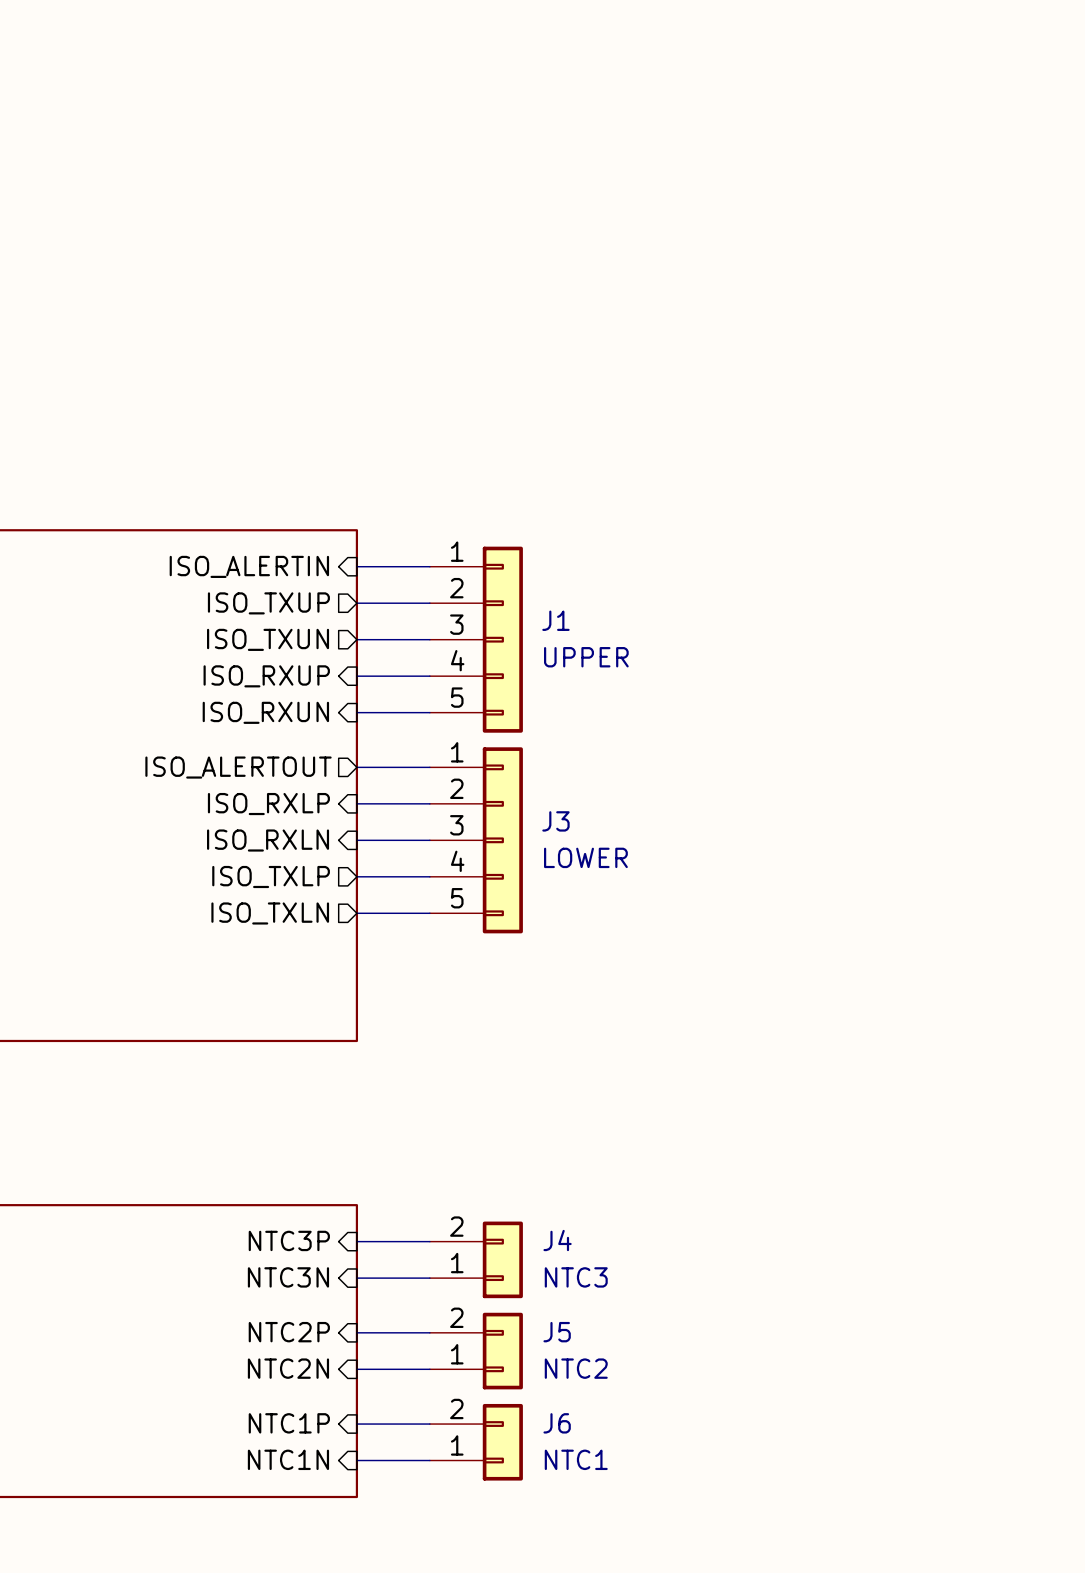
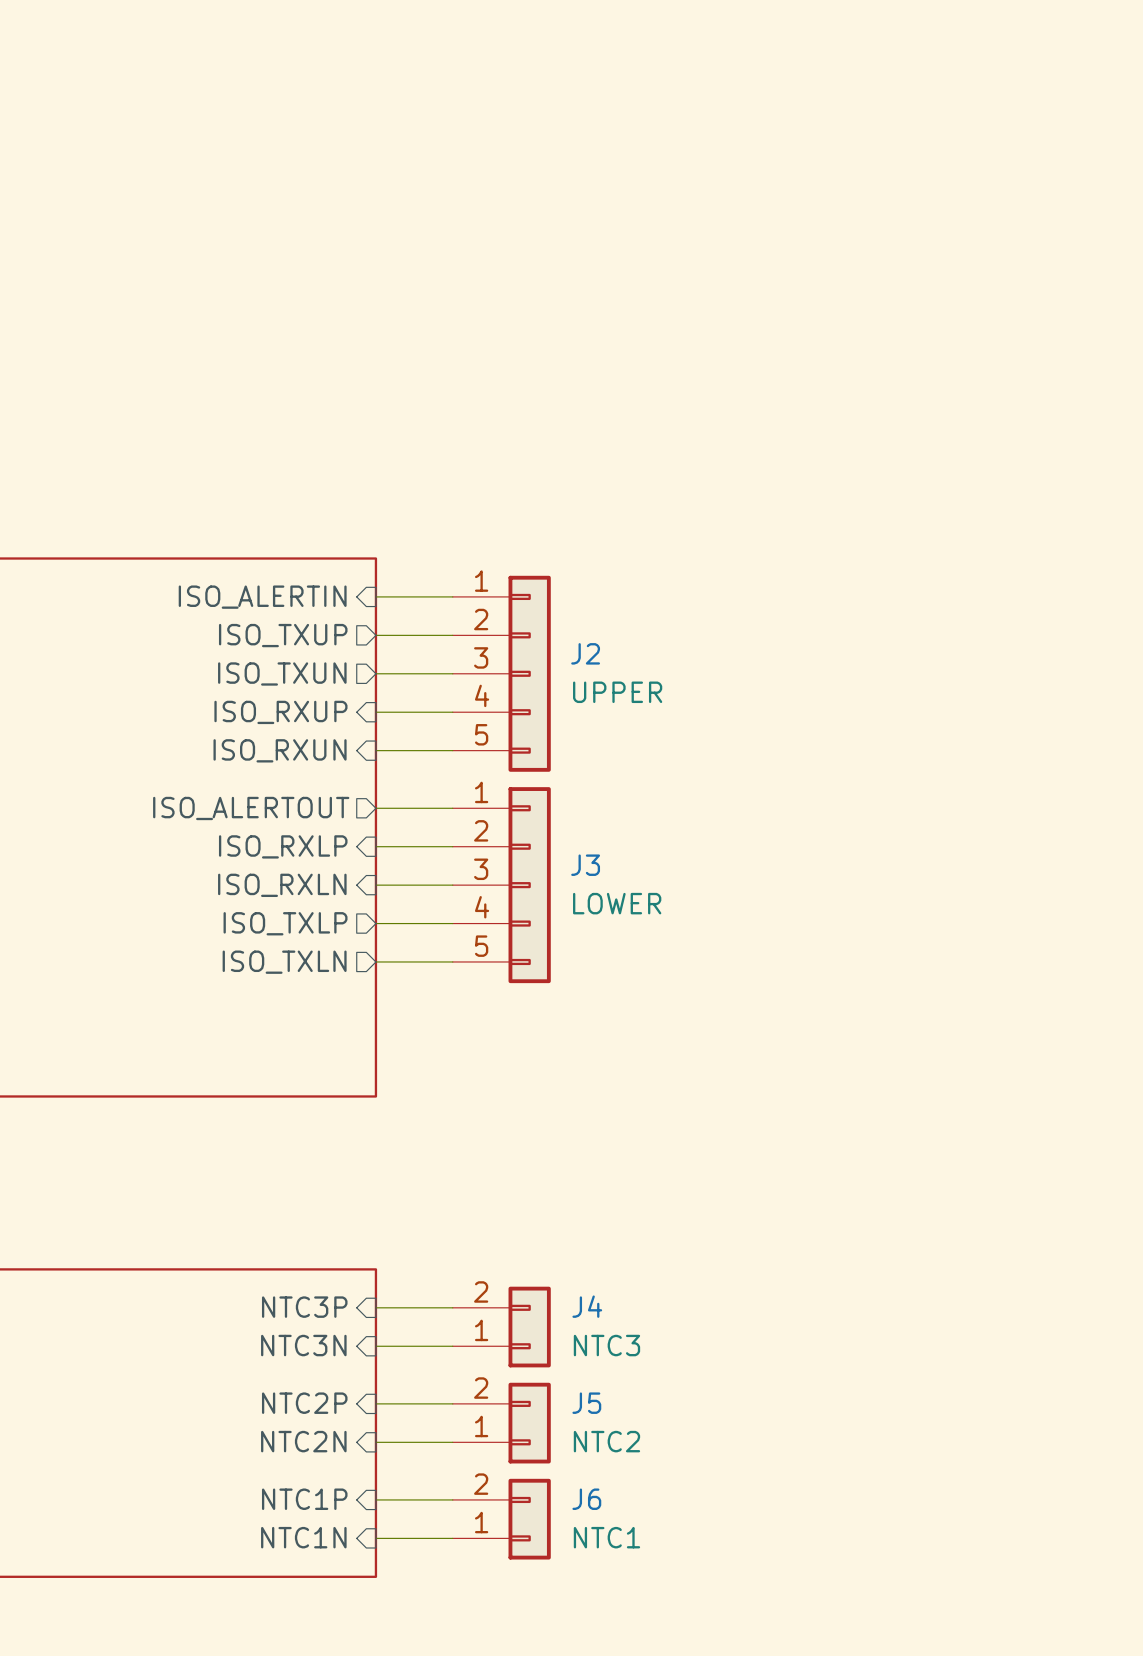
J1 name: J1 (555, 620) -> J2 (585, 653)

